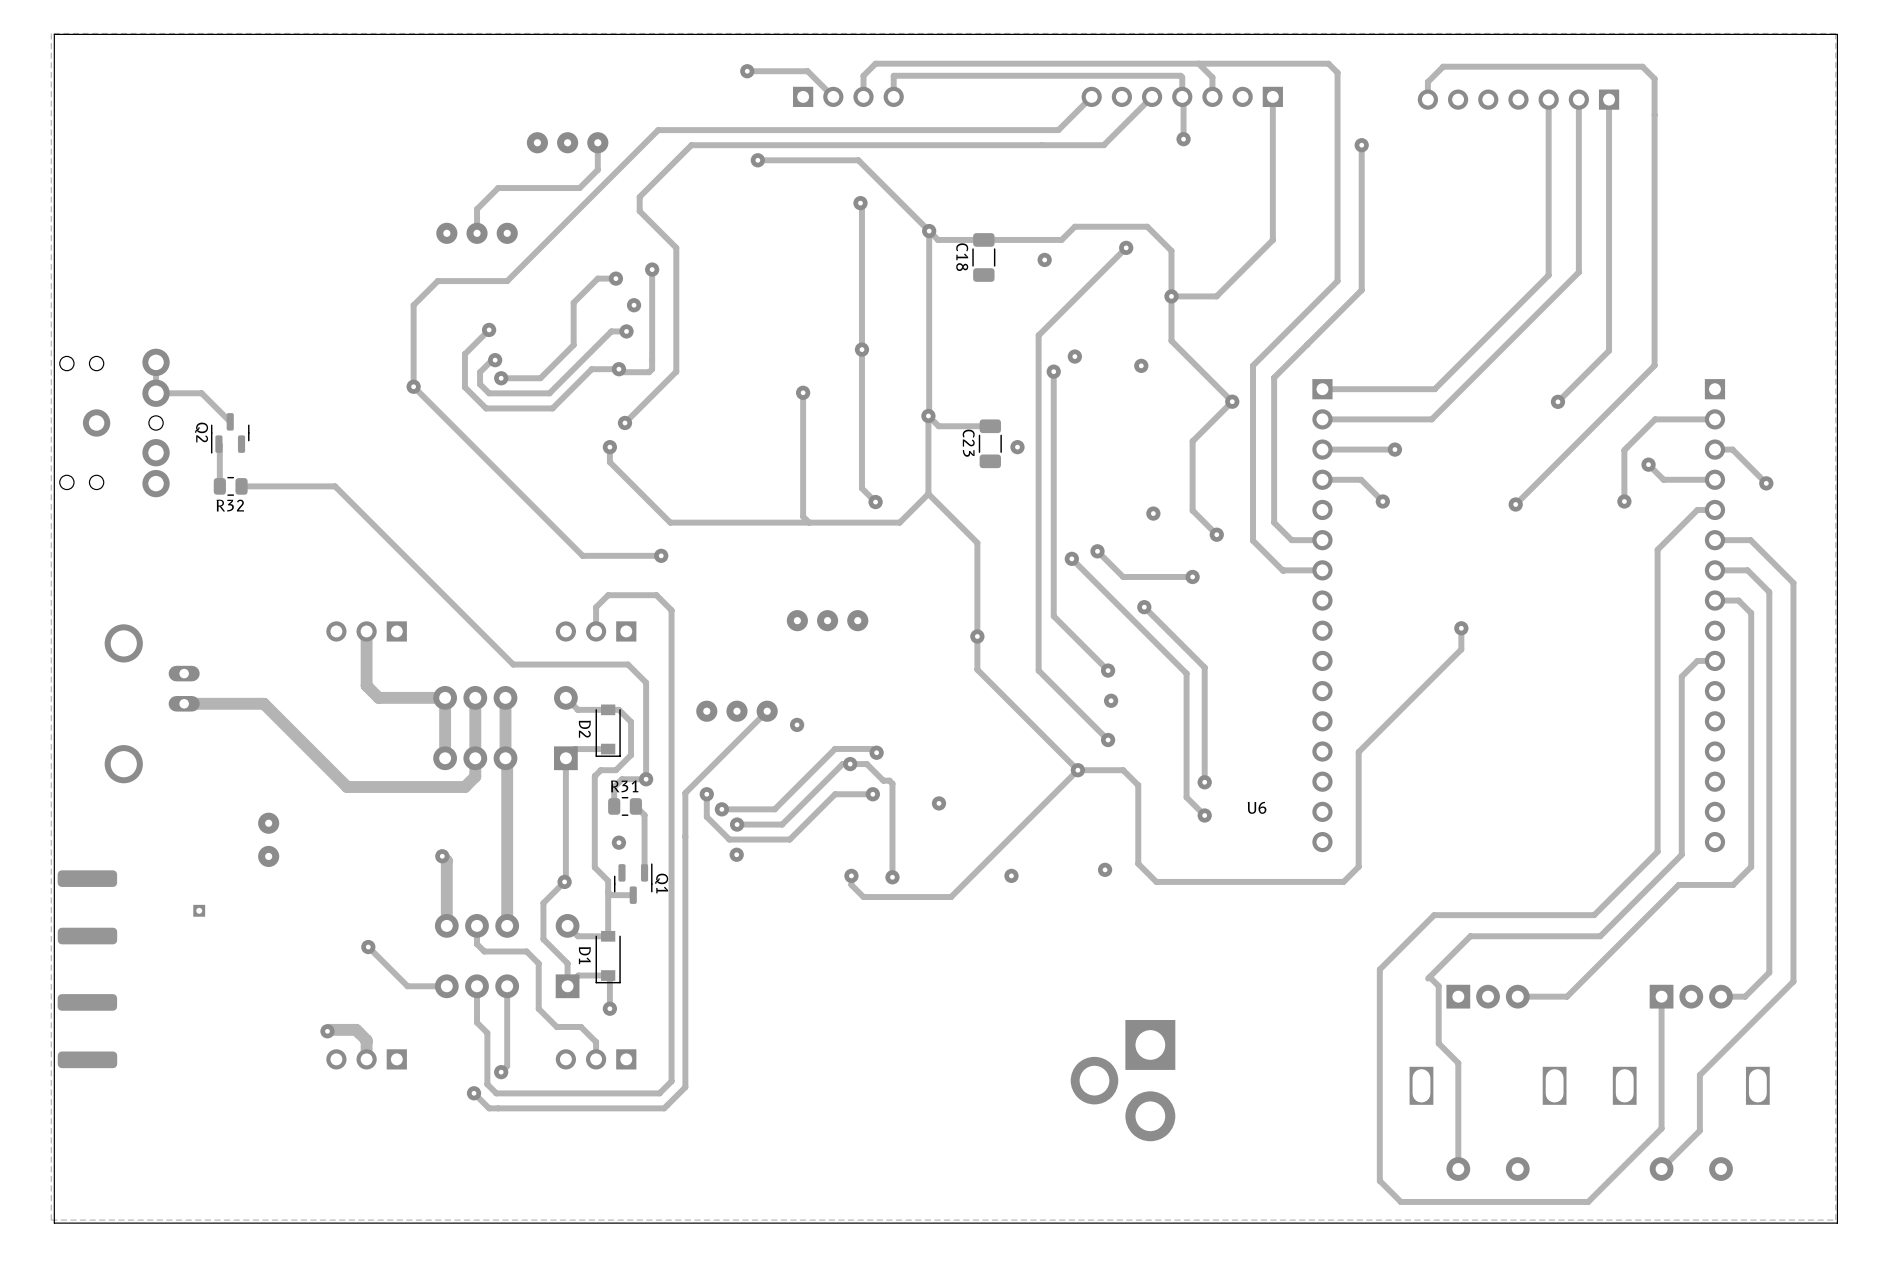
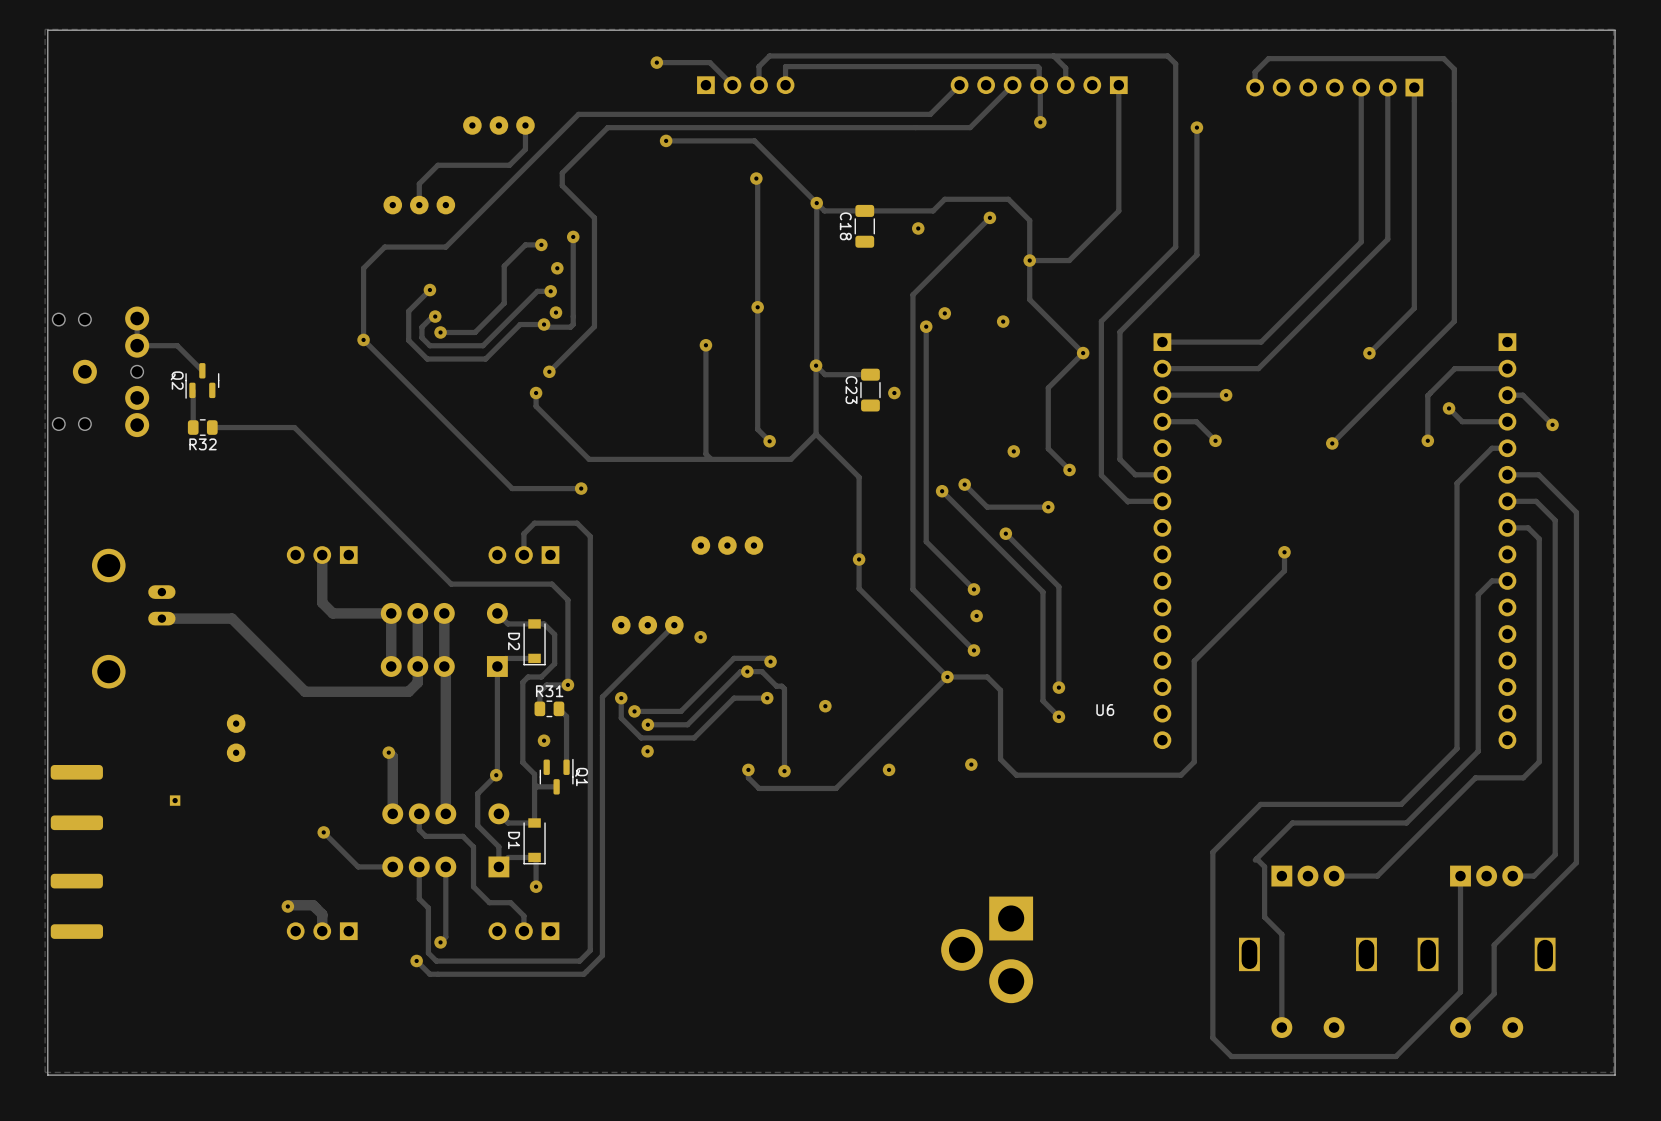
via: none -> (555, 312)

